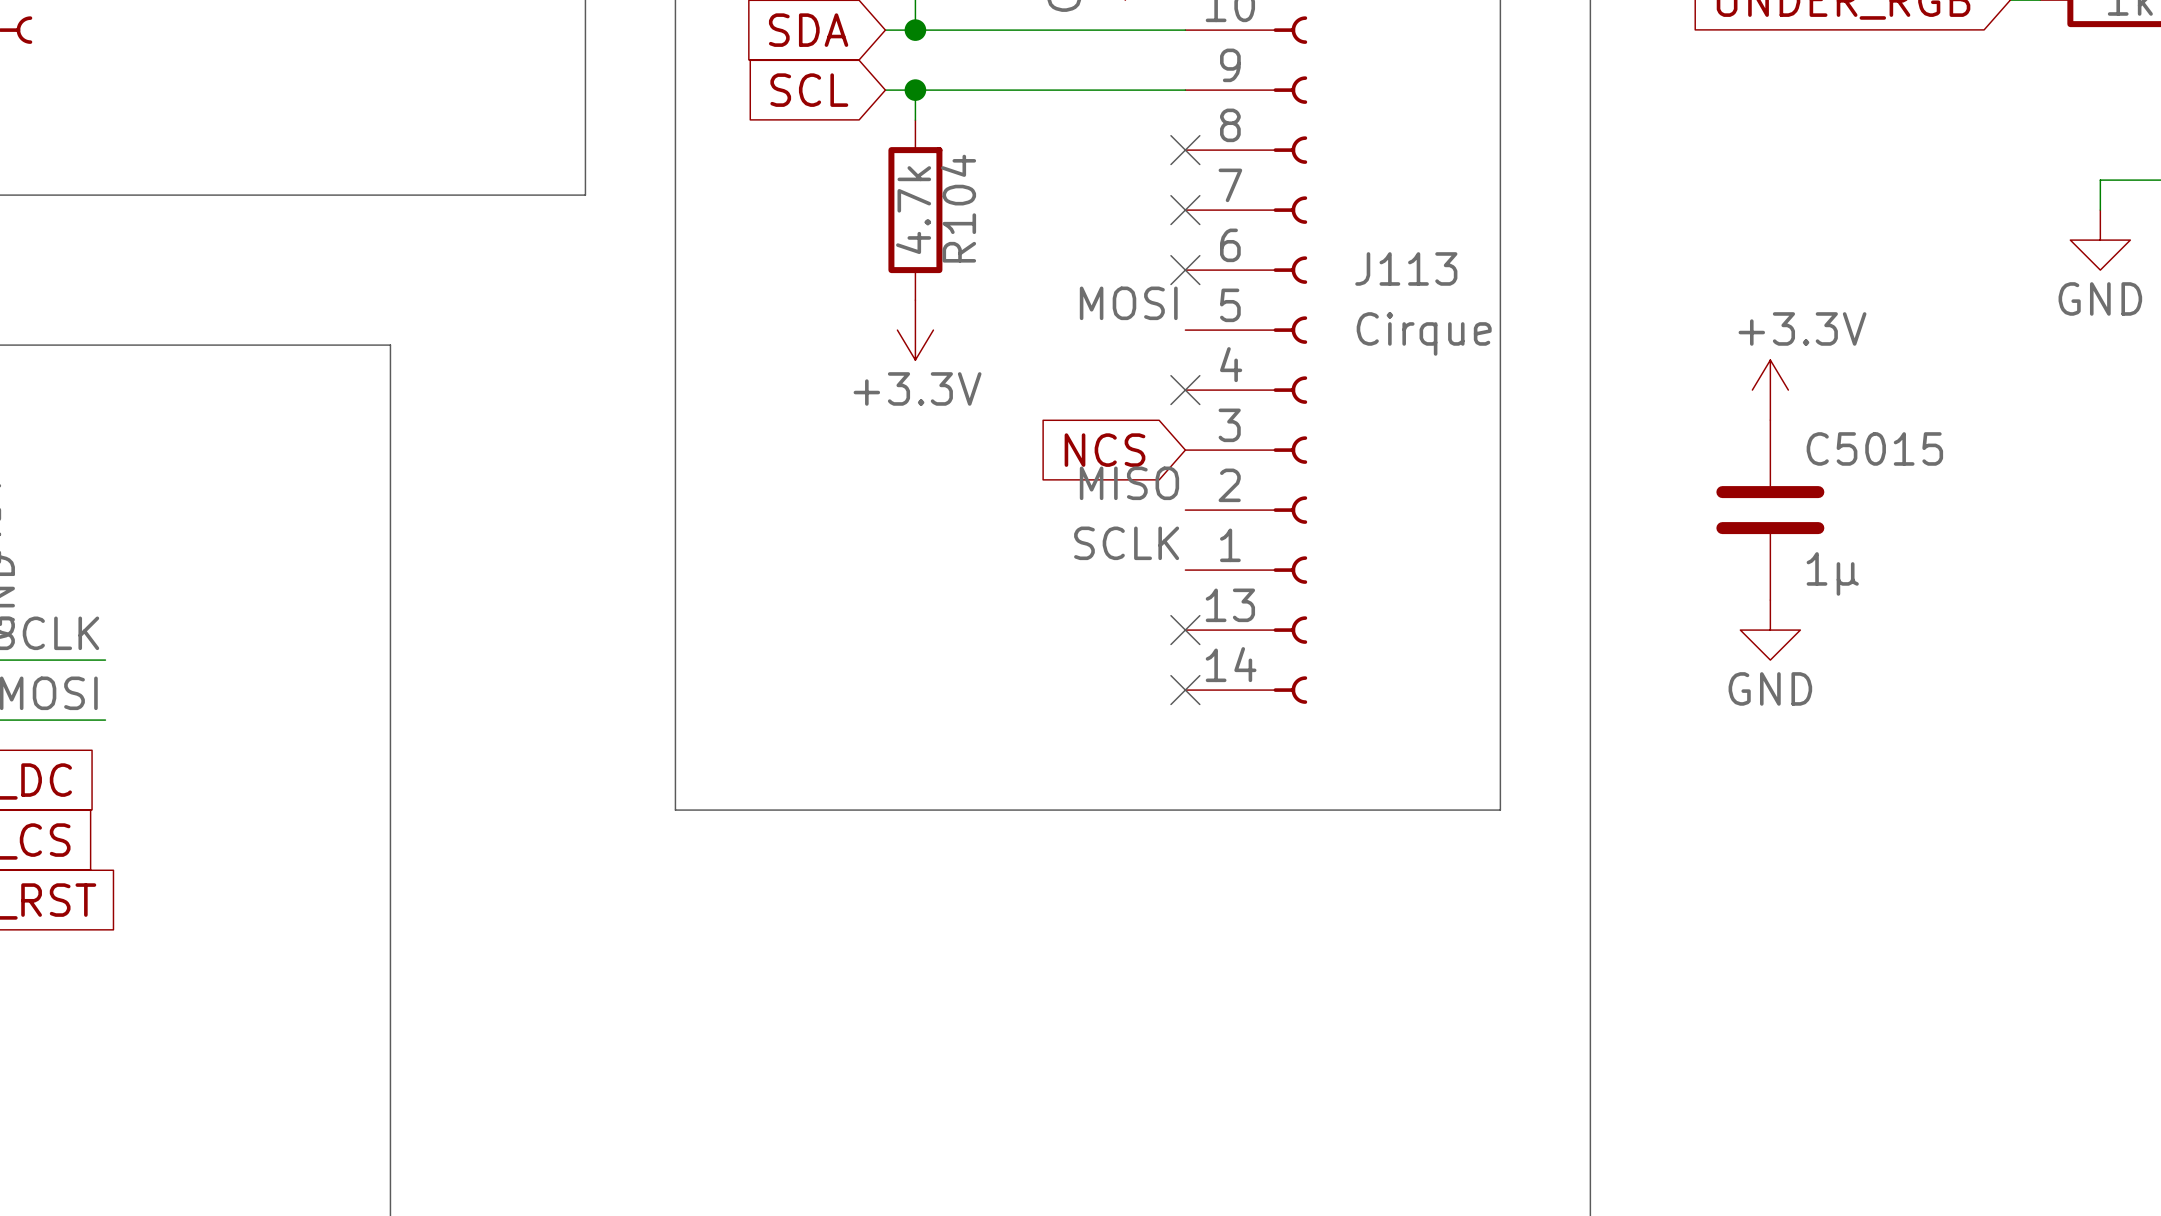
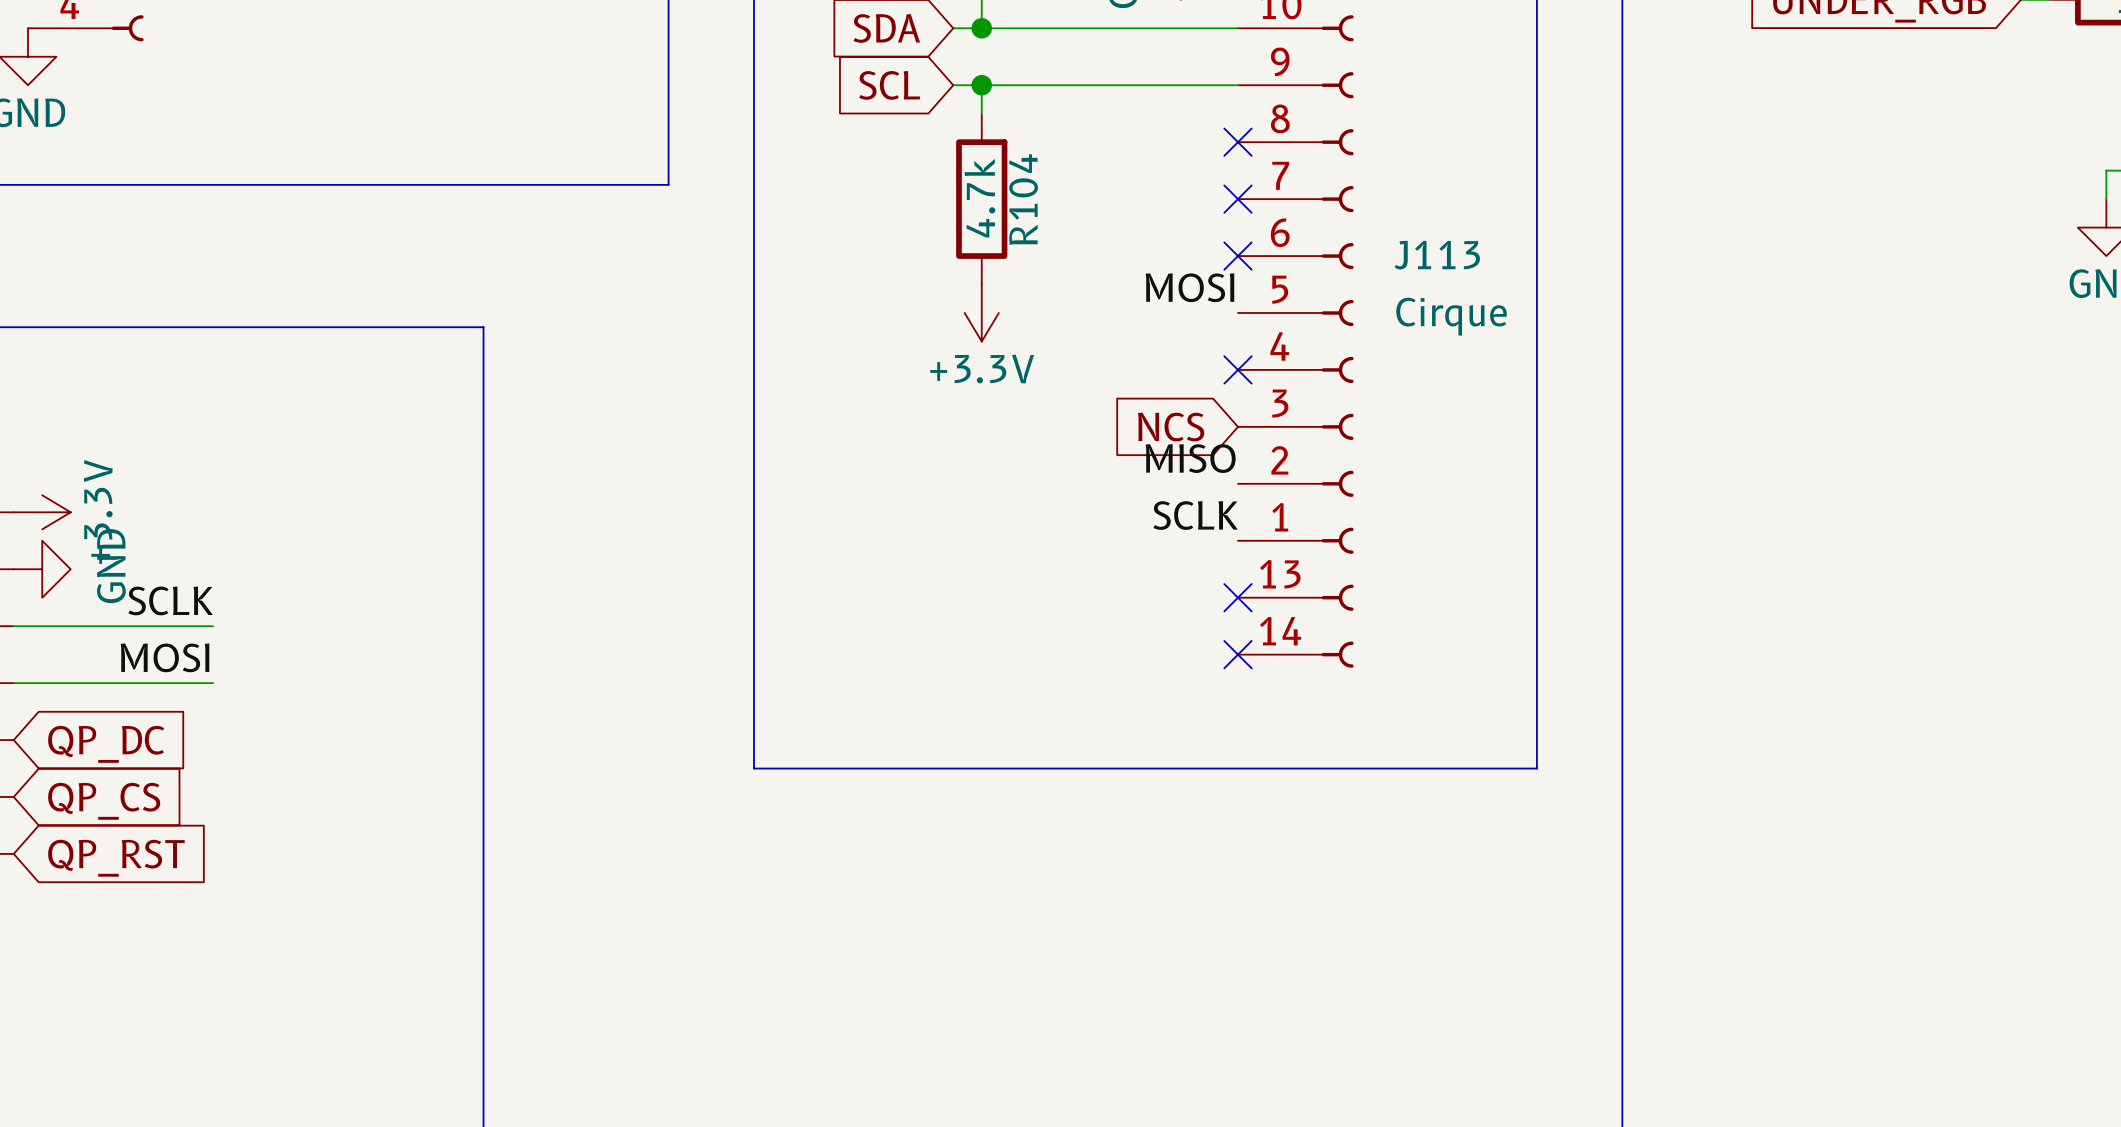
power symbol: +3.3V (1770, 390) -> none
C5015: 1µ (1770, 510) -> none
power symbol: GND (1770, 630) -> none

